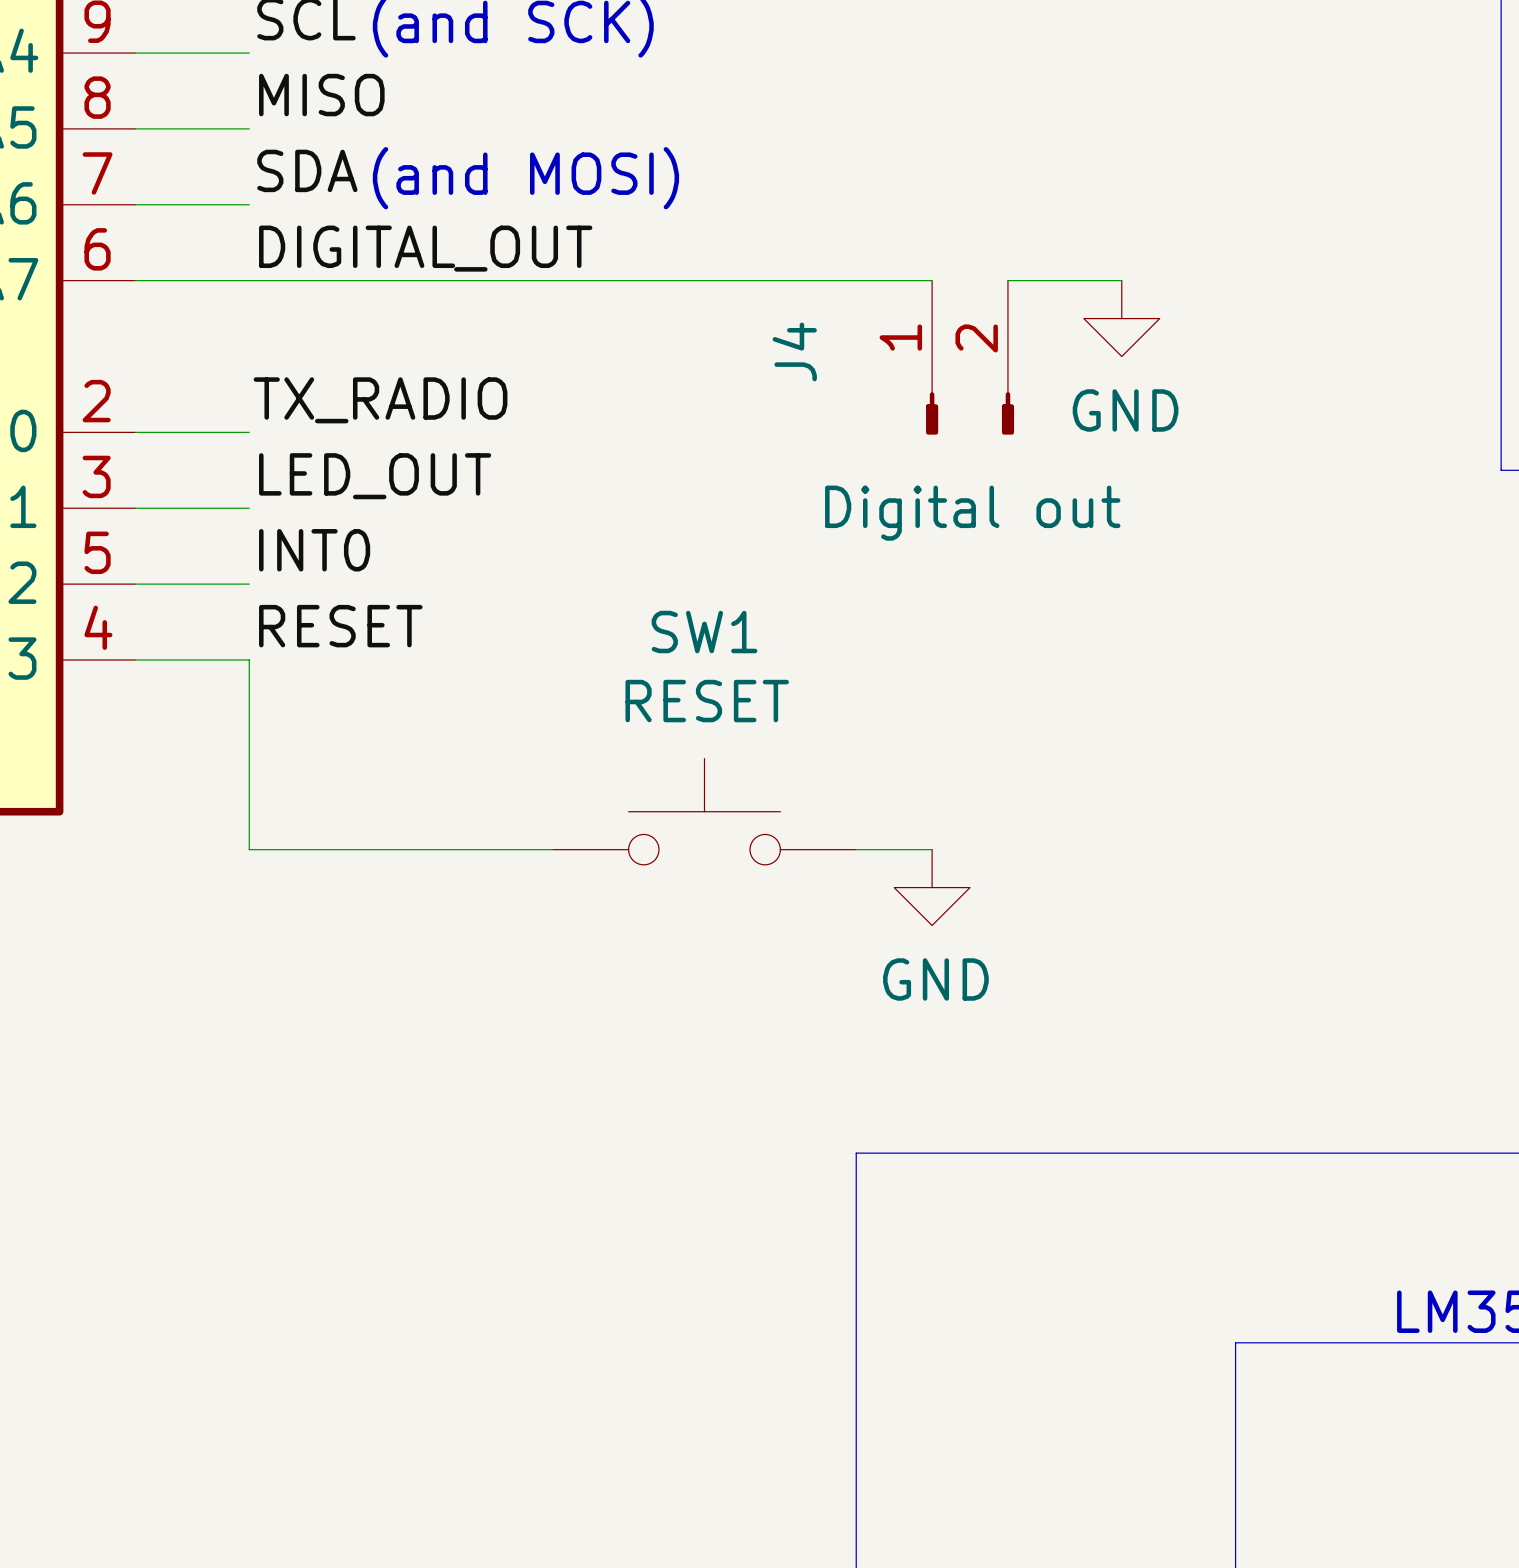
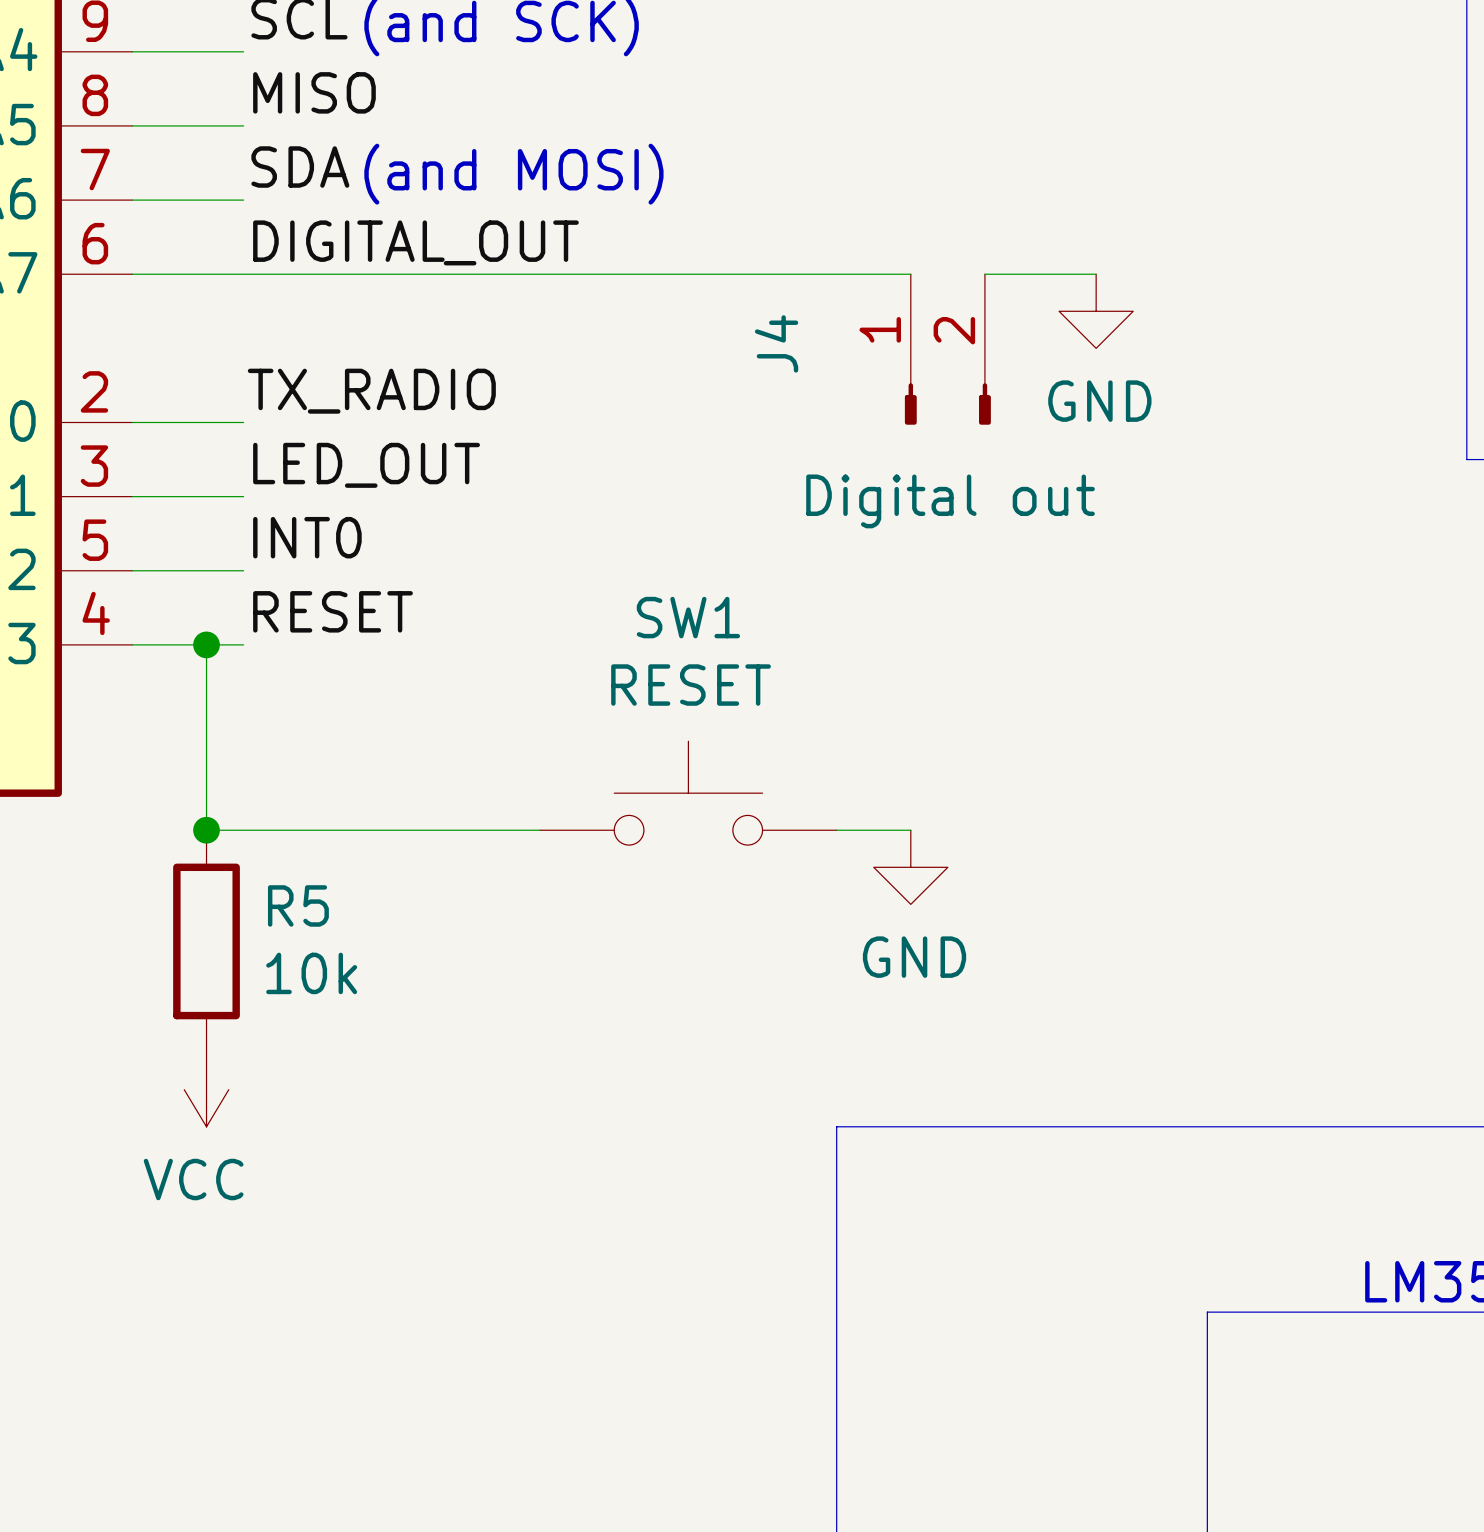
junction: none -> (206, 644)
wire: (249, 659) (249, 849) -> (206, 644) (206, 830) (243, 830)
junction: none -> (206, 830)
R5: none -> 10k (206, 941)
power symbol: none -> VCC (206, 1089)

